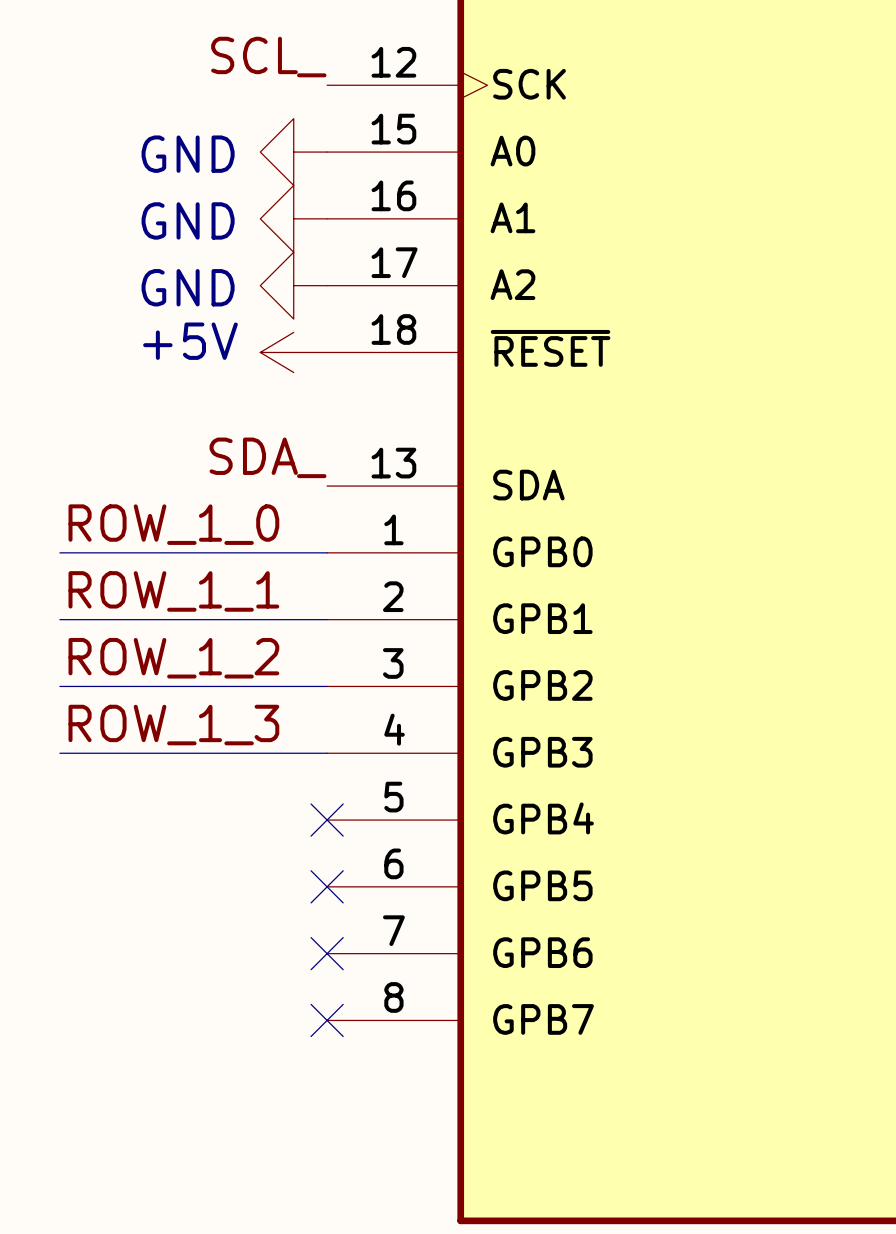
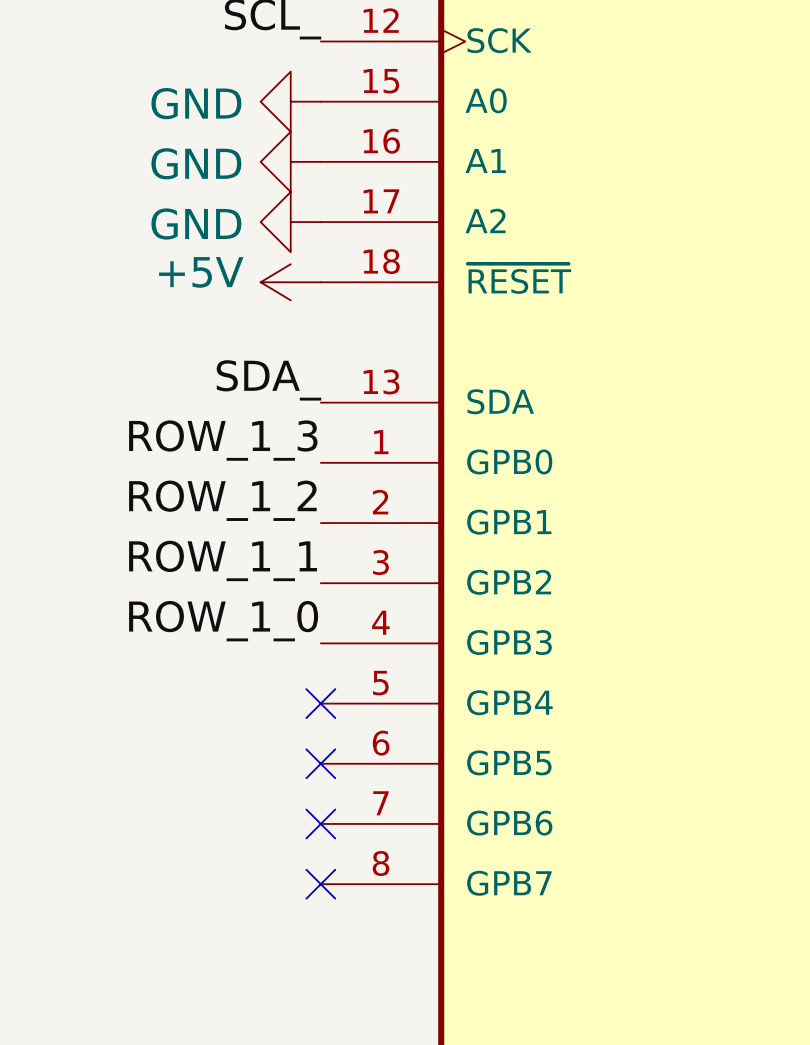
label position: ROW_1_0 (173, 524) -> ROW_1_0 (223, 621)
wire: (59, 552) (327, 552) -> none
label position: ROW_1_1 (173, 591) -> ROW_1_1 (223, 560)
wire: (59, 619) (327, 619) -> none
label position: ROW_1_2 (173, 658) -> ROW_1_2 (222, 500)
wire: (59, 686) (327, 686) -> none
label position: ROW_1_3 (173, 725) -> ROW_1_3 (223, 440)
wire: (59, 753) (327, 753) -> none

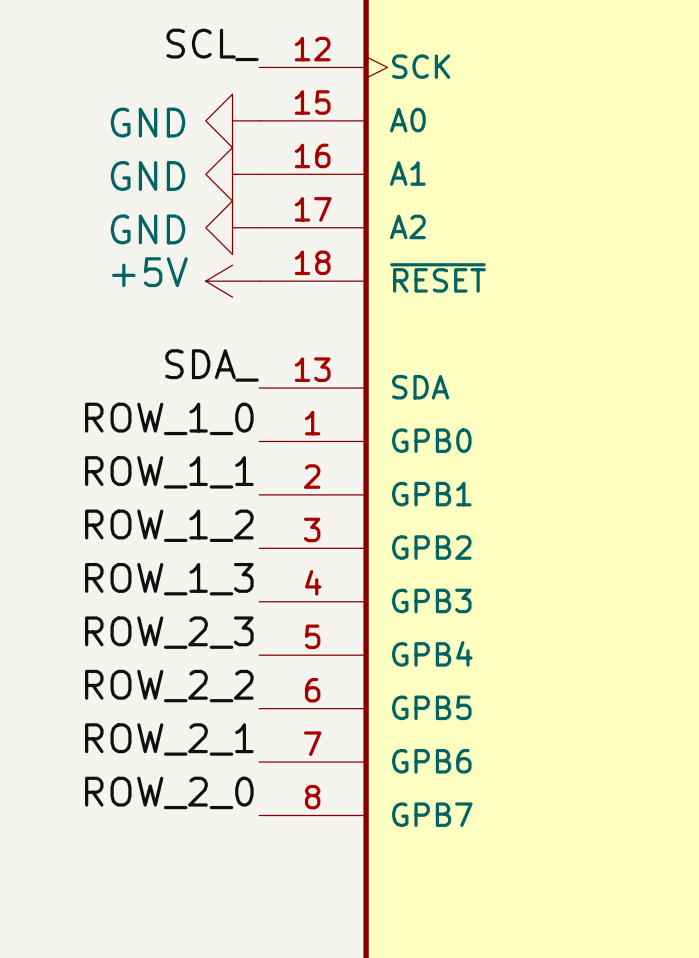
label: ROW_1_3 (223, 440) -> ROW_1_0 (169, 418)
label: ROW_1_2 (222, 500) -> ROW_1_1 (169, 472)
label: ROW_1_1 (223, 560) -> ROW_1_2 (169, 525)
label: ROW_1_0 (223, 621) -> ROW_1_3 (169, 579)
label: none -> ROW_2_3 (169, 632)
no-connect mark: (320, 703) -> none
label: none -> ROW_2_2 (169, 686)
no-connect mark: (320, 763) -> none
label: none -> ROW_2_1 (169, 739)
no-connect mark: (320, 823) -> none
label: none -> ROW_2_0 (169, 792)
no-connect mark: (320, 884) -> none

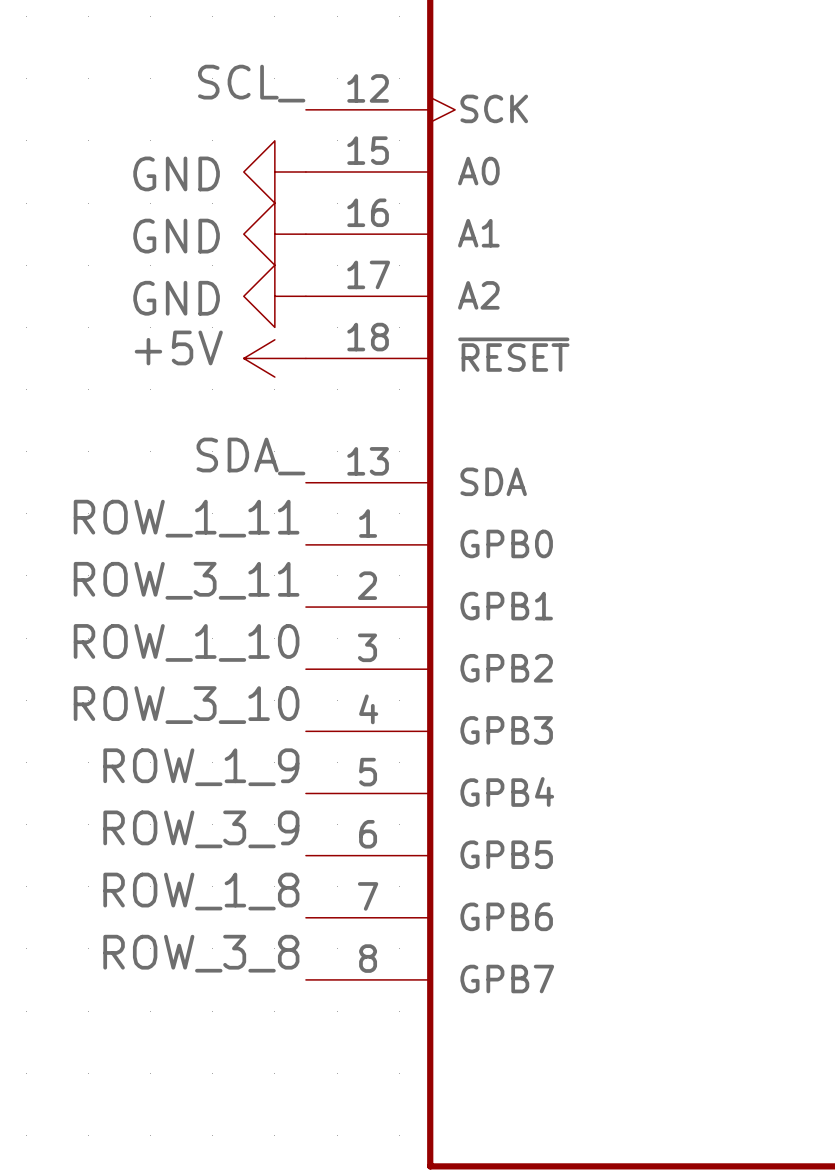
label: ROW_1_0 (169, 418) -> ROW_1_11 (186, 518)
label: ROW_1_1 (169, 472) -> ROW_3_11 (186, 580)
label: ROW_1_2 (169, 525) -> ROW_1_10 (186, 642)
label: ROW_1_3 (169, 579) -> ROW_3_10 (186, 705)
label: ROW_2_3 (169, 632) -> ROW_1_9 (201, 767)
label: ROW_2_2 (169, 686) -> ROW_3_9 (201, 829)
label: ROW_2_1 (169, 739) -> ROW_1_8 (201, 891)
label: ROW_2_0 (169, 792) -> ROW_3_8 (201, 953)

